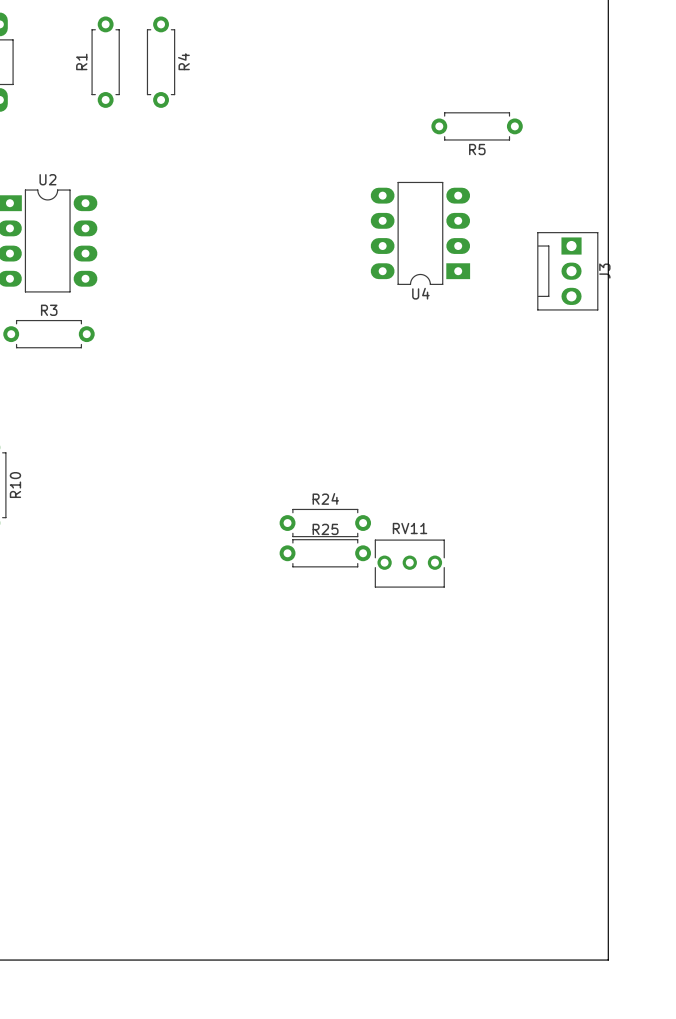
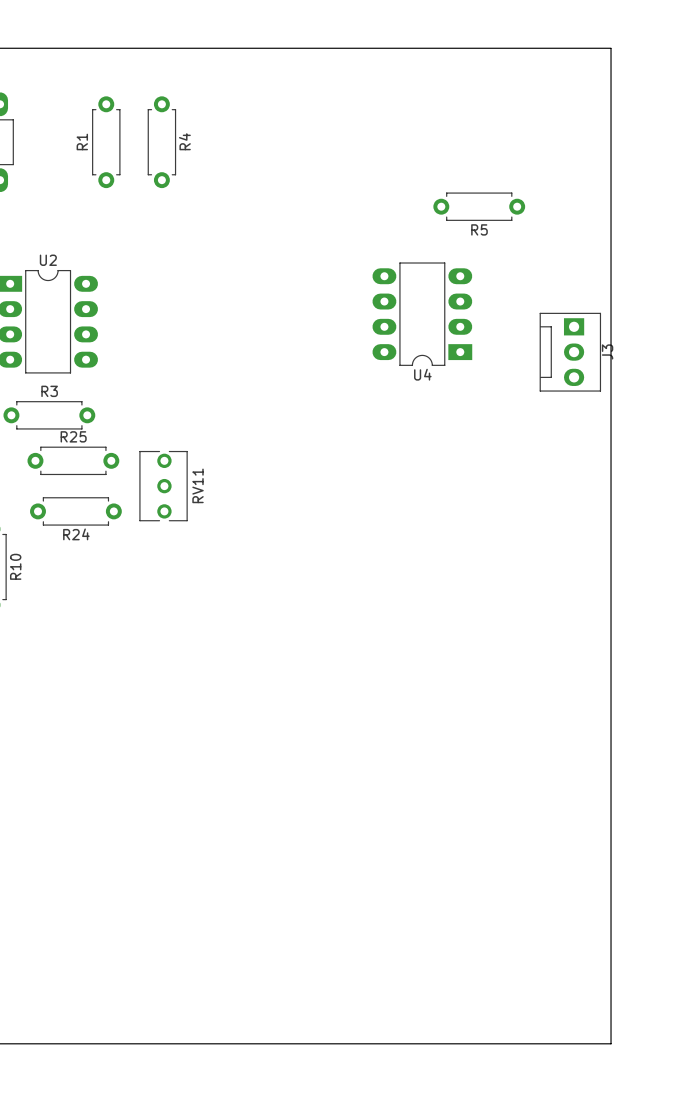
R24 name position: R24 (325, 498) -> R24 (76, 534)
R24 position: (325, 523) -> (75, 511)
R25 position: (325, 553) -> (73, 460)
RV11 rotation: 0° (409, 563) -> 90° clockwise (163, 486)
RV11 position: (409, 563) -> (163, 486)

